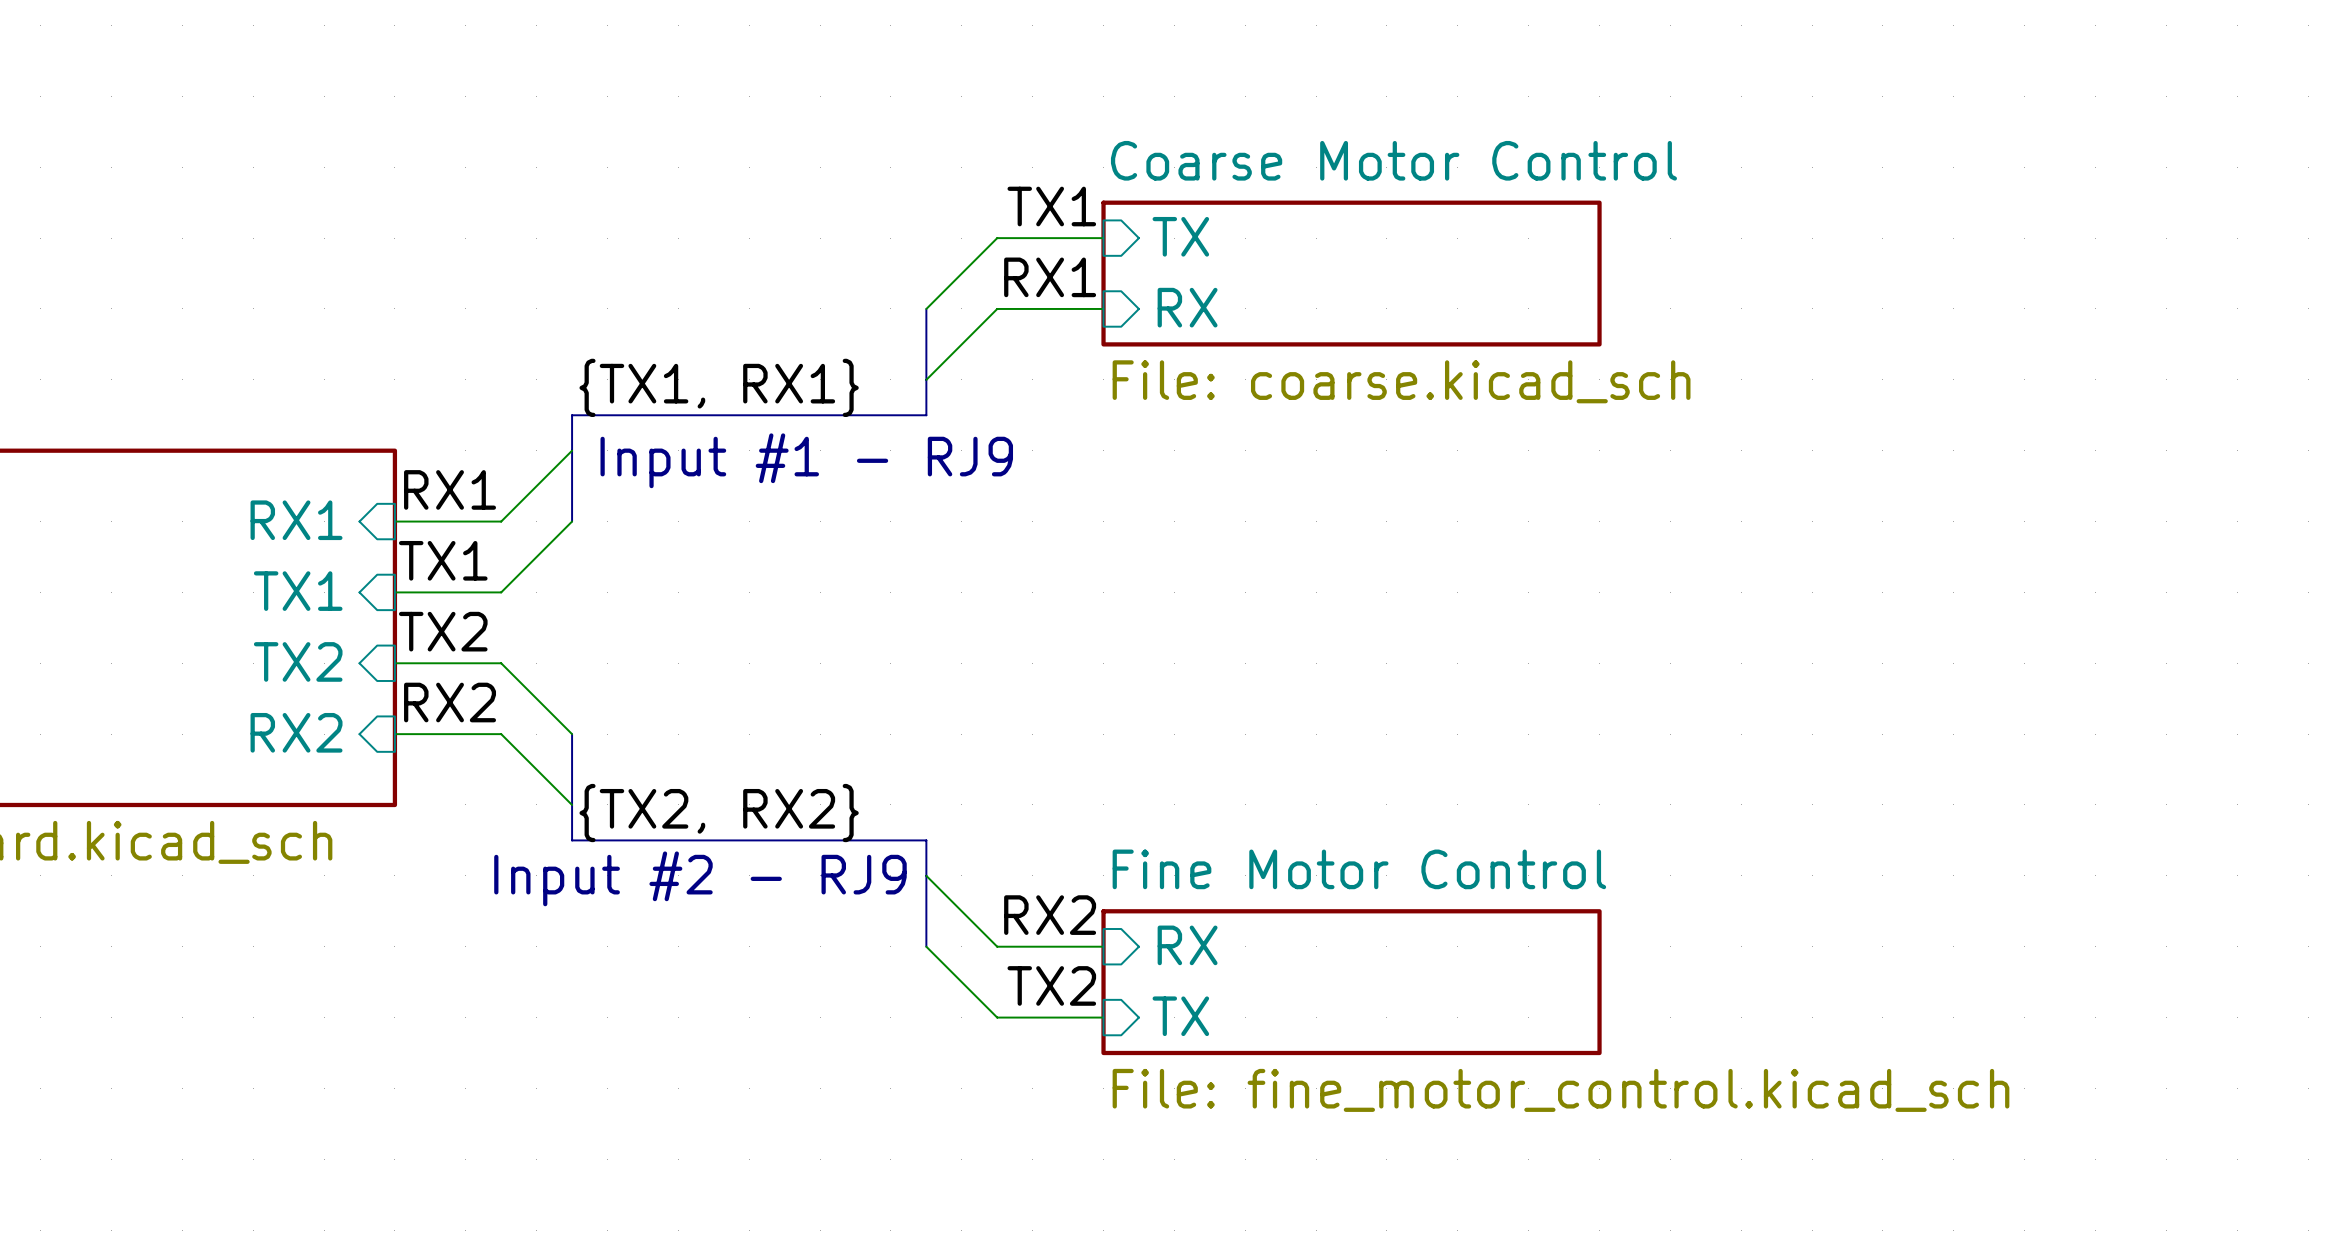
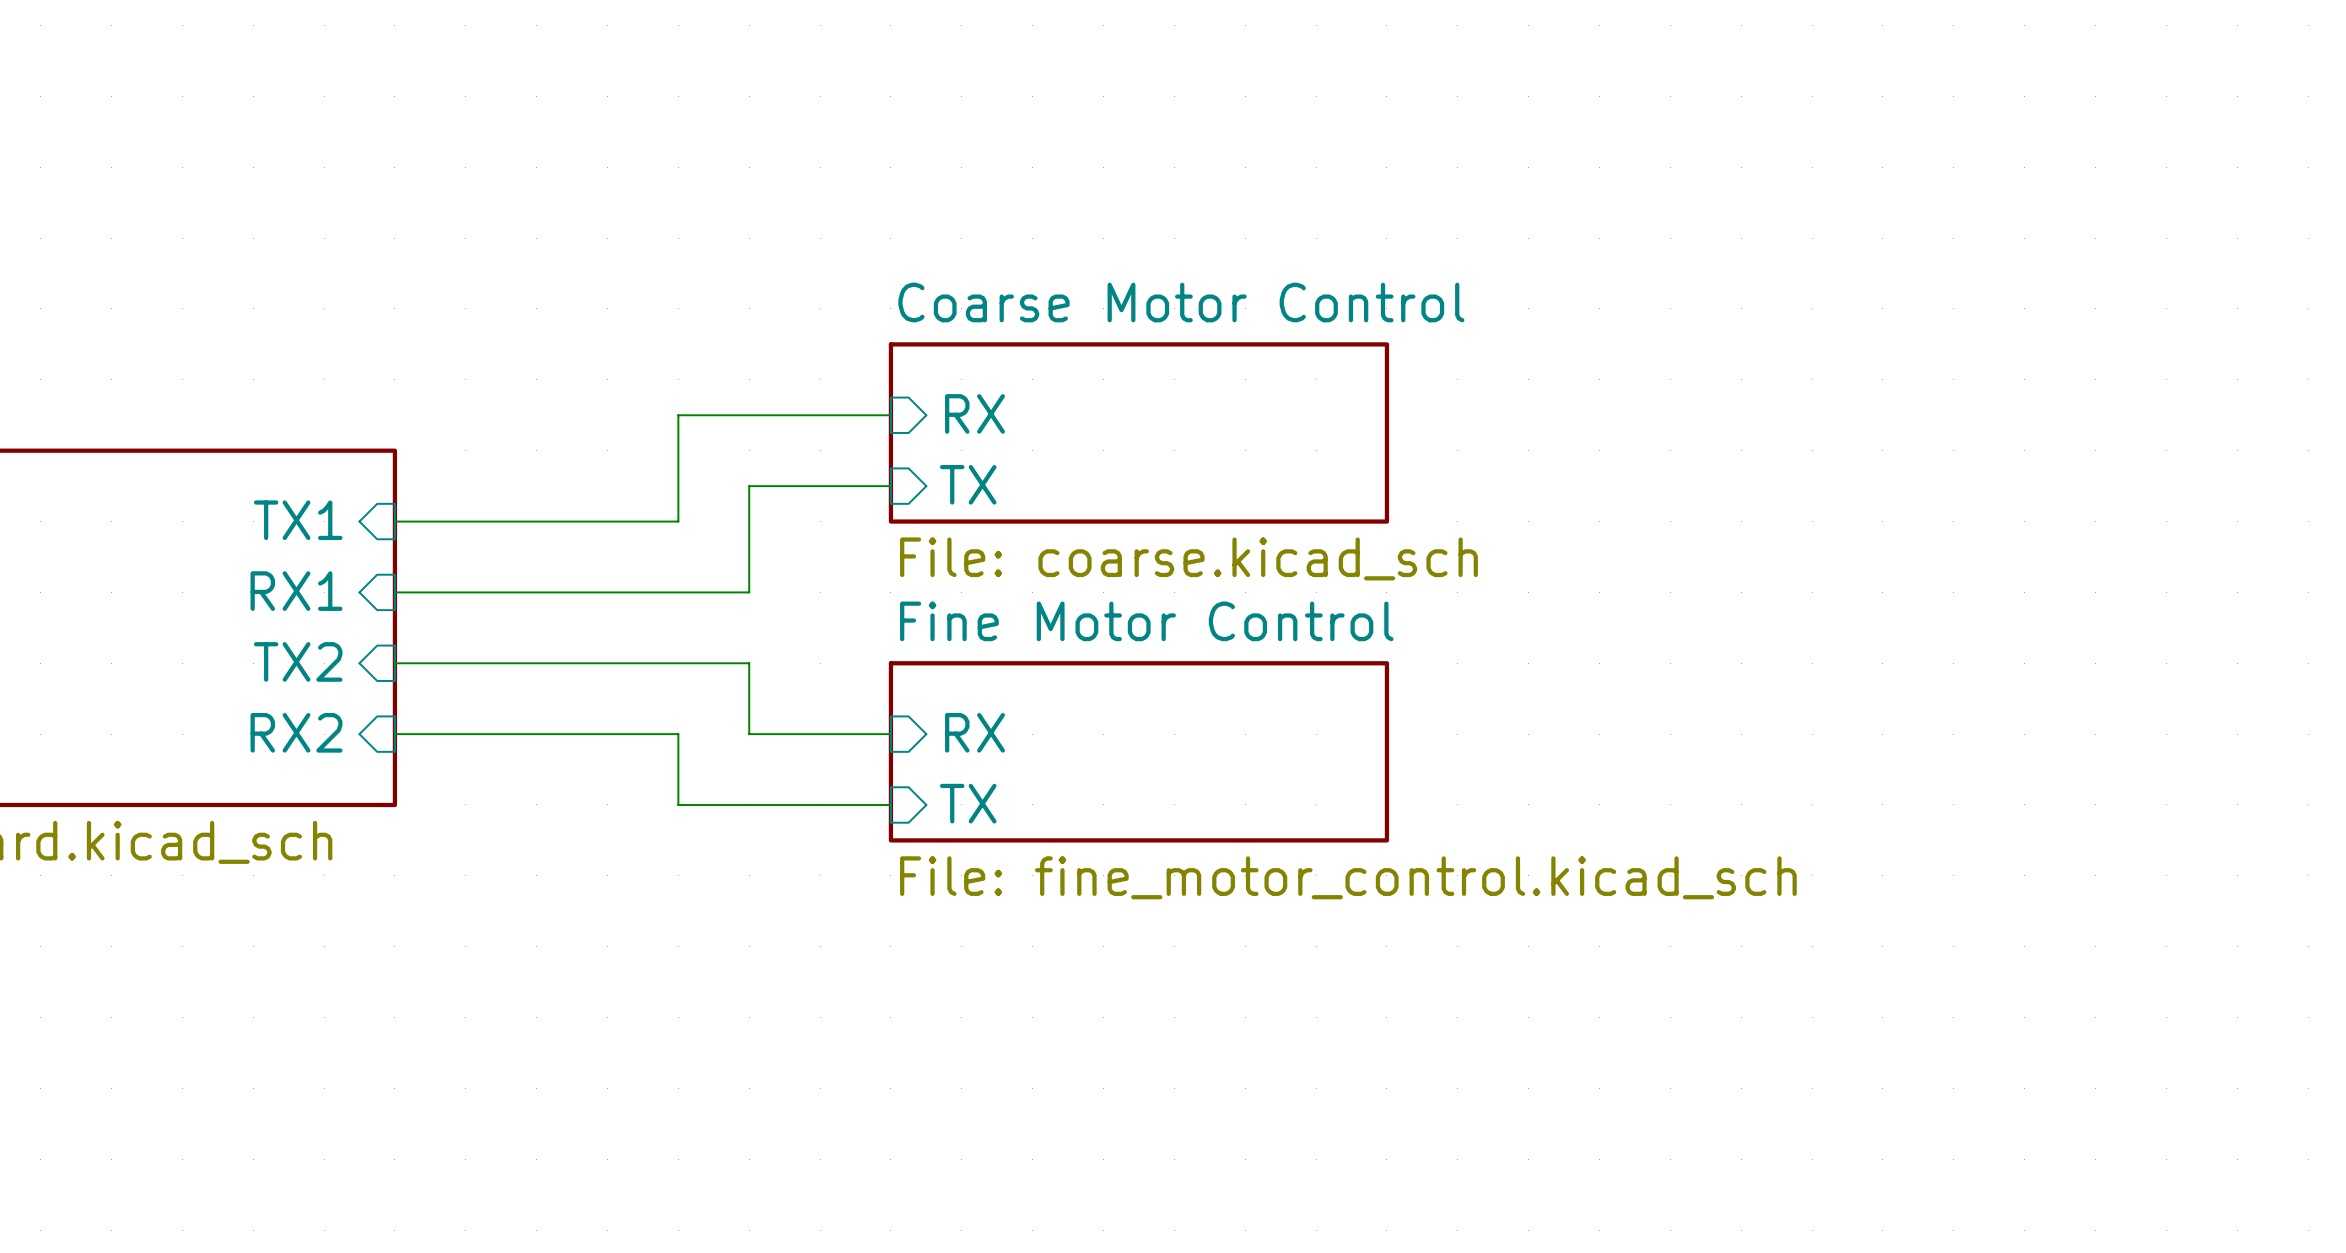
label: TX1 (1051, 206) -> none
sheet pin: TX (1180, 236) -> none
wire: (1103, 238) (997, 238) (926, 308) -> none
sheet Coarse Motor Control: File: coarse.kicad_sch (1351, 273) -> none
label: RX1 (1050, 277) -> none
sheet pin: RX (1187, 307) -> none
bus: (926, 308) (926, 415) (572, 415) (572, 521) -> none
wire: (1103, 308) (997, 308) (926, 379) -> none
label: {TX1, RX1} (719, 387) -> none
sheet pin: none -> RX (975, 413)
sheet Coarse Motor Control: none -> File: coarse.kicad_sch (1138, 432)
wire: (572, 450) (501, 521) -> (890, 415) (678, 415) (678, 521) (501, 521)
text: Input #1 - RJ9 (806, 460) -> none
sheet pin: none -> TX (968, 484)
label: RX1 (450, 489) -> none
sheet pin: RX1 (296, 520) -> TX1 (298, 520)
wire: (572, 521) (501, 592) -> (890, 486) (749, 486) (749, 592) (501, 592)
label: TX1 (443, 560) -> none
sheet pin: TX1 (298, 591) -> RX1 (296, 591)
label: TX2 (443, 631) -> none
wire: (501, 663) (572, 734) -> (501, 663) (749, 663) (749, 734) (890, 734)
label: RX2 (450, 702) -> none
sheet pin: none -> RX (975, 732)
wire: (501, 734) (572, 804) -> (501, 734) (678, 734) (678, 804) (890, 804)
bus: (572, 734) (572, 840) (926, 840) (926, 946) -> none
sheet Fine Motor Control: none -> File: fine_motor_control.kicad_sch (1138, 751)
sheet pin: none -> TX (968, 803)
label: {TX2, RX2} (719, 813) -> none
wire: (926, 875) (997, 946) (1103, 946) -> none
text: Input #2 - RJ9 (700, 878) -> none
label: RX2 (1050, 915) -> none
sheet pin: RX (1187, 945) -> none
wire: (926, 946) (997, 1017) (1103, 1017) -> none
sheet Fine Motor Control: File: fine_motor_control.kicad_sch (1351, 982) -> none
label: TX2 (1051, 985) -> none
sheet pin: TX (1180, 1016) -> none

